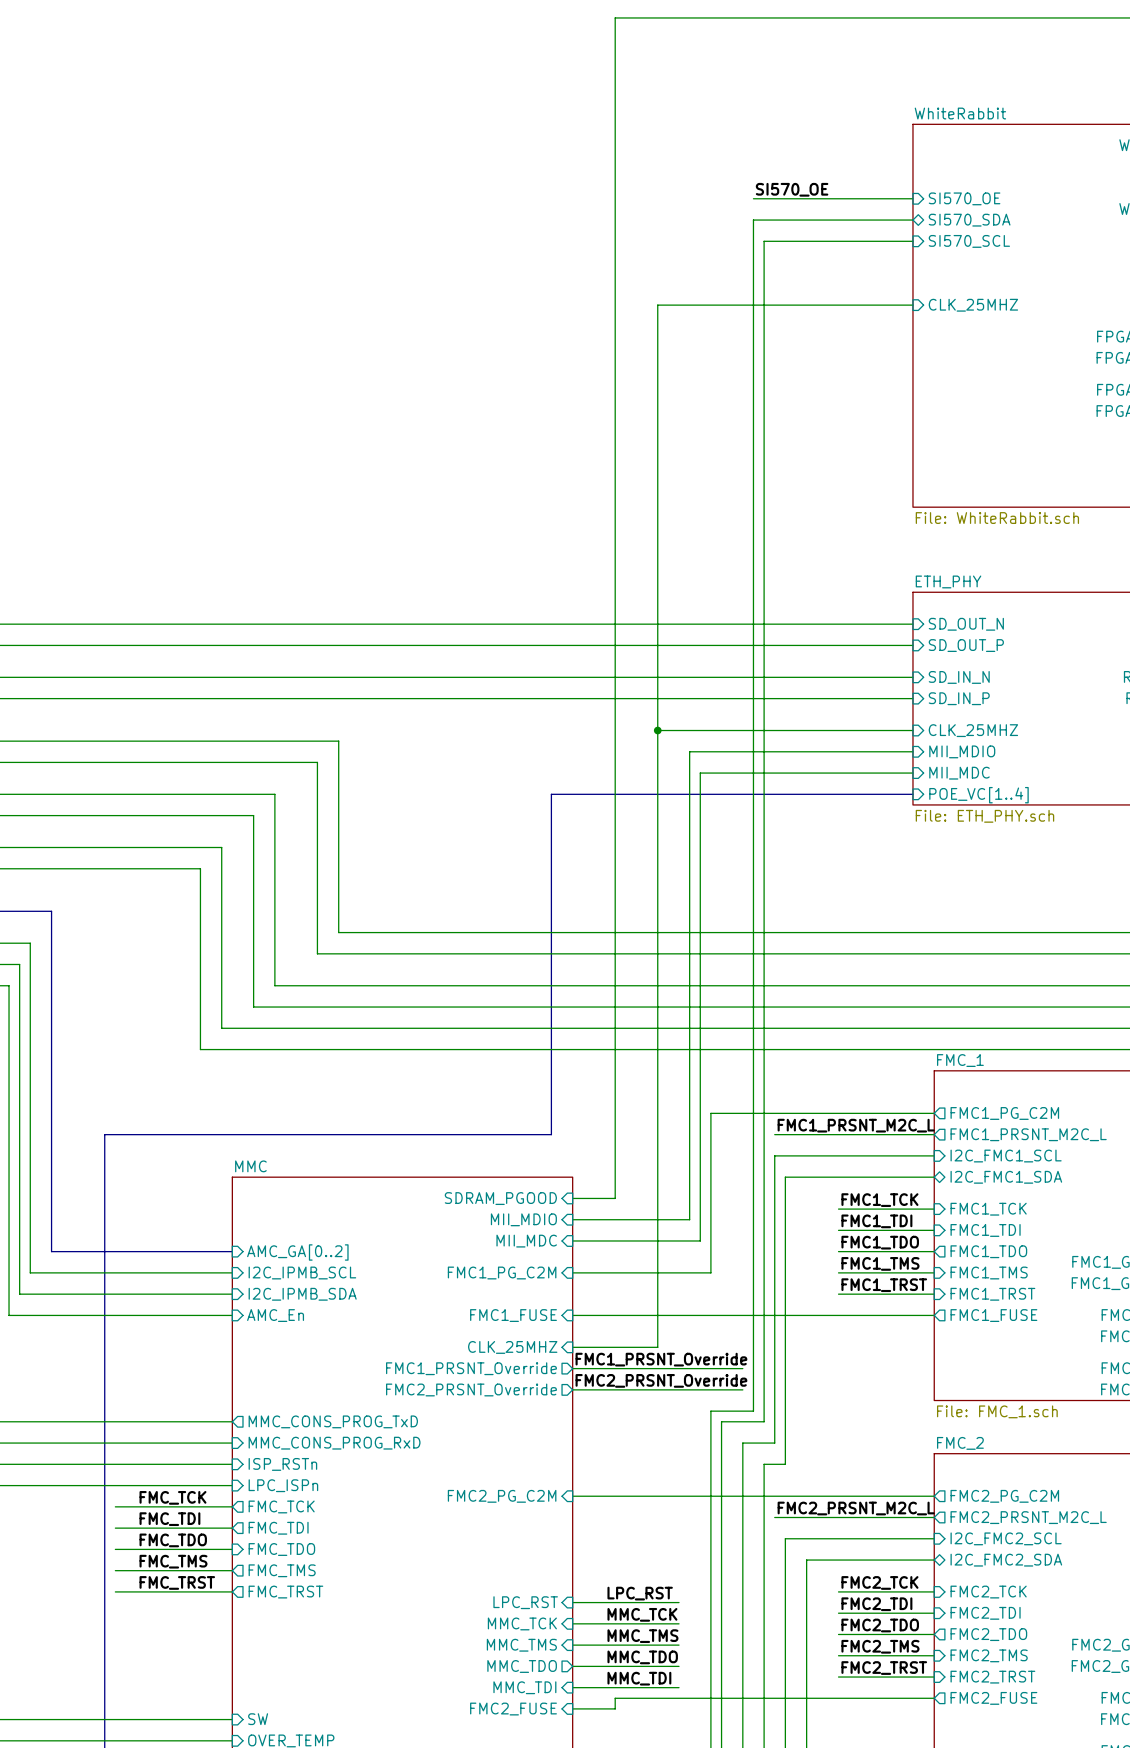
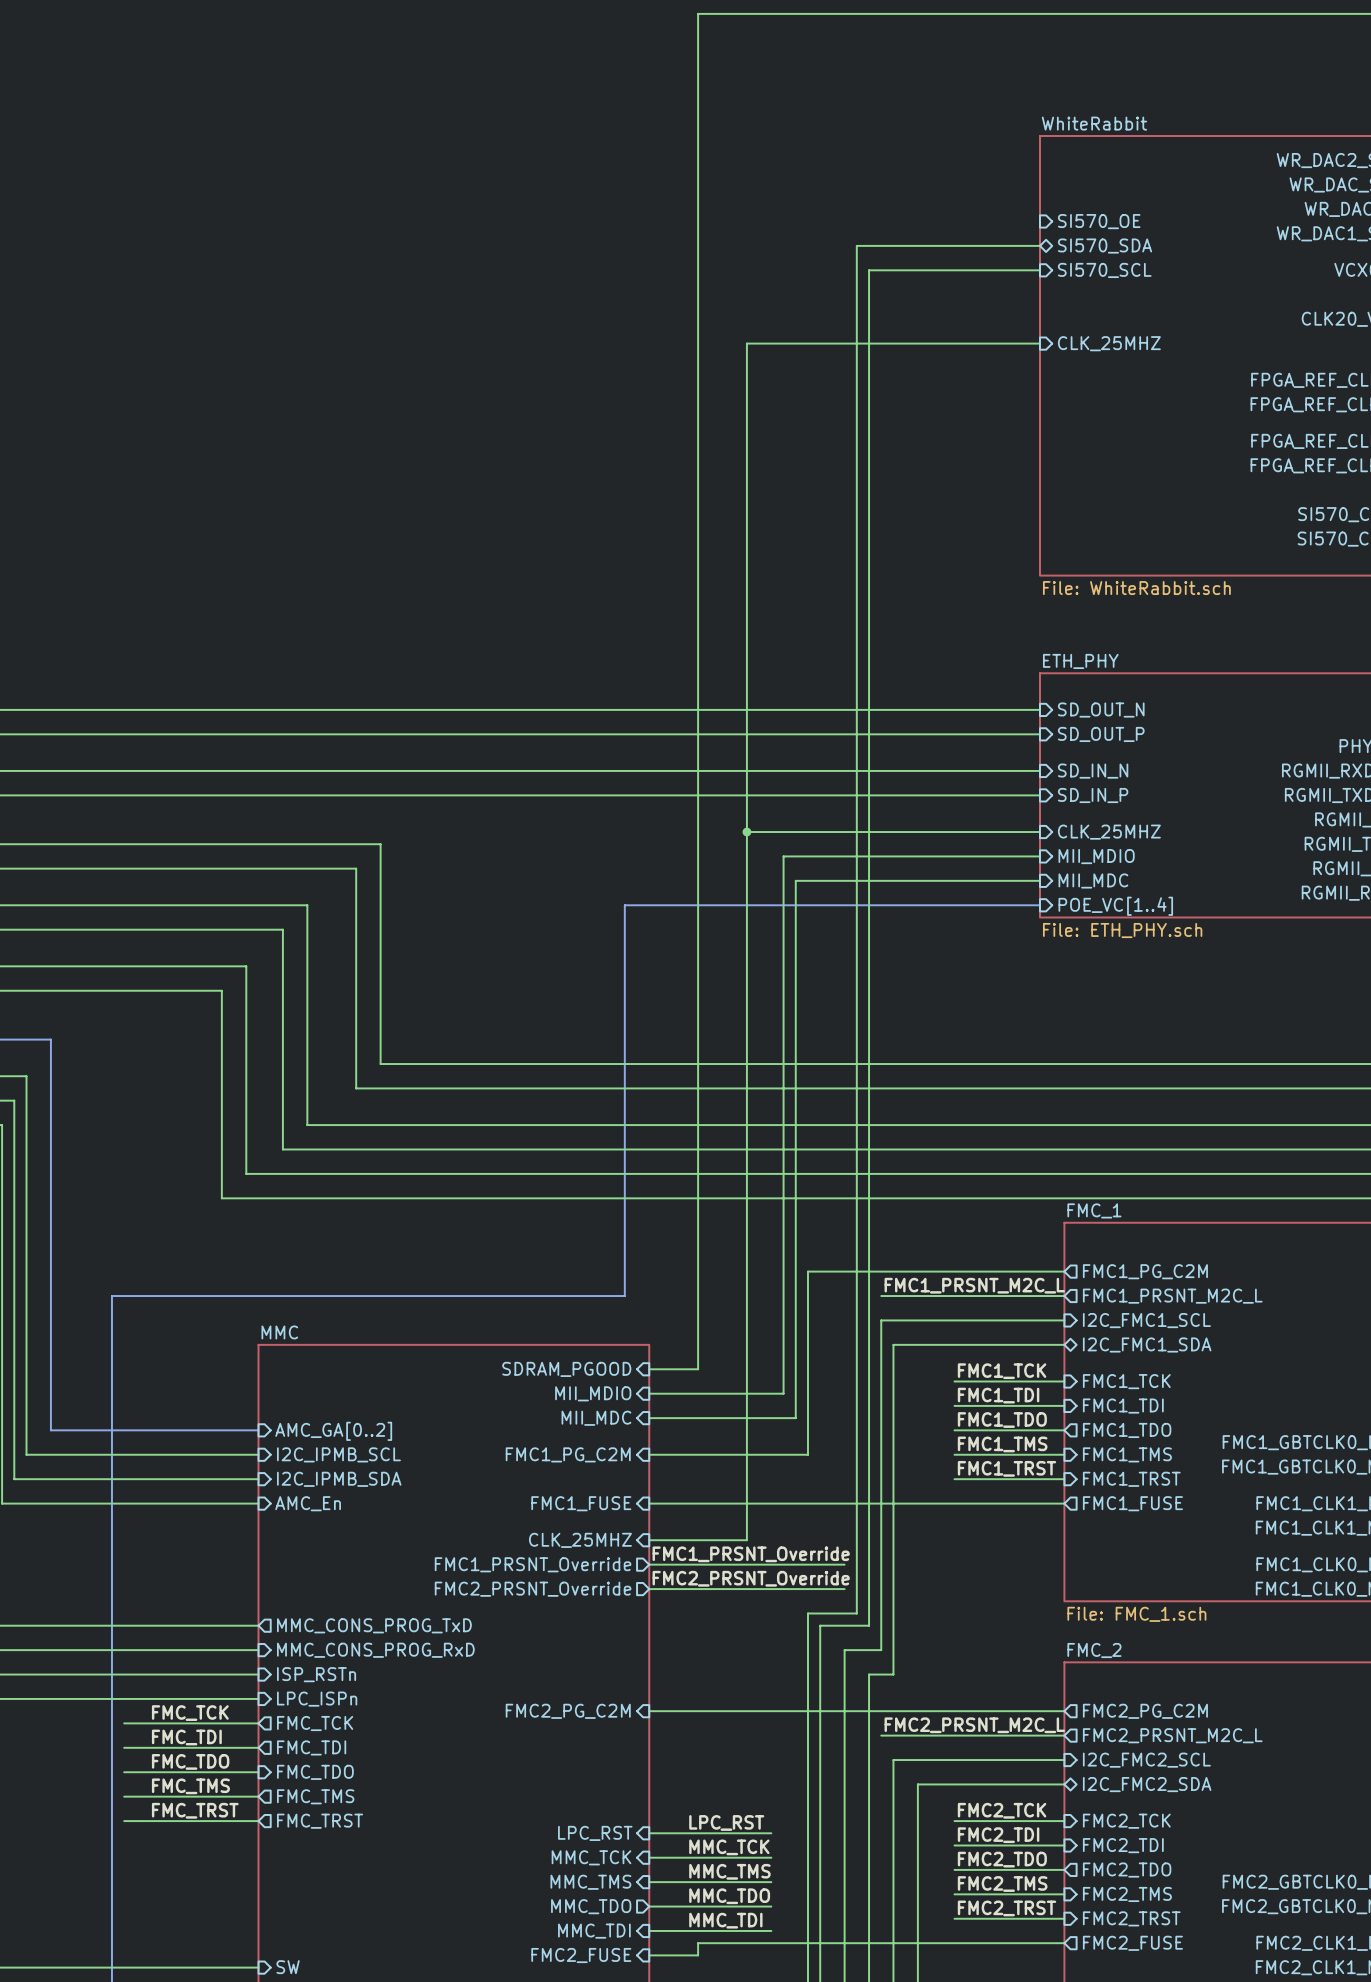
label: SI570_OE (792, 189) -> none
wire: (753, 198) (912, 198) -> none

